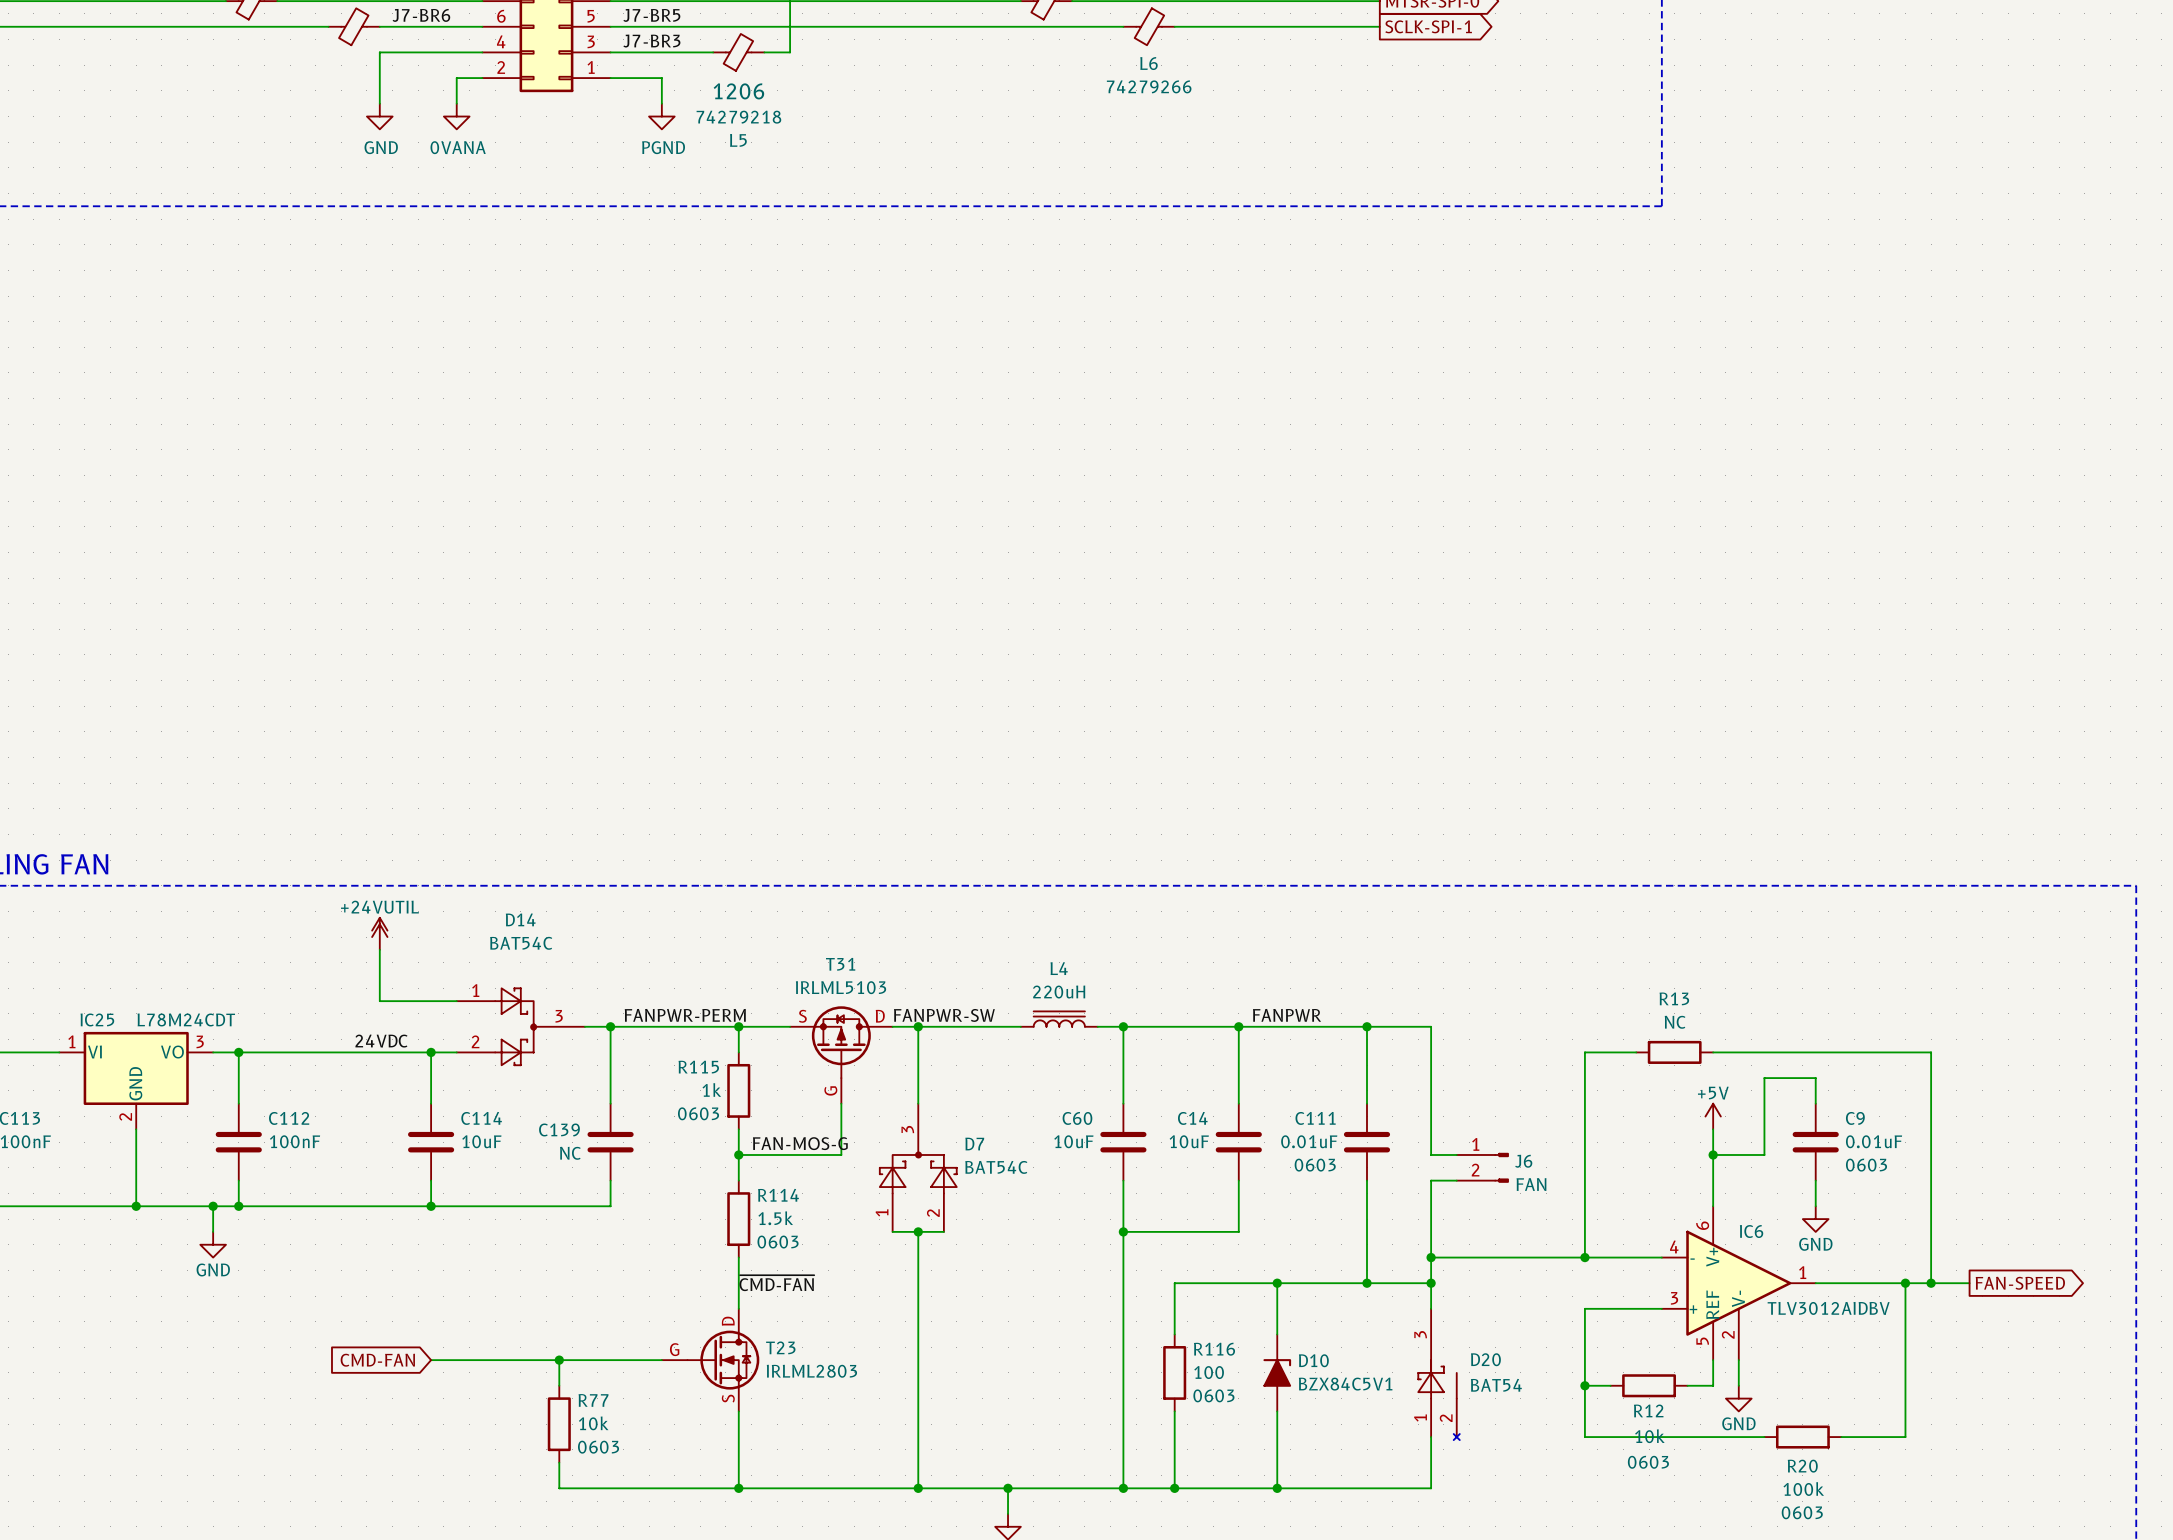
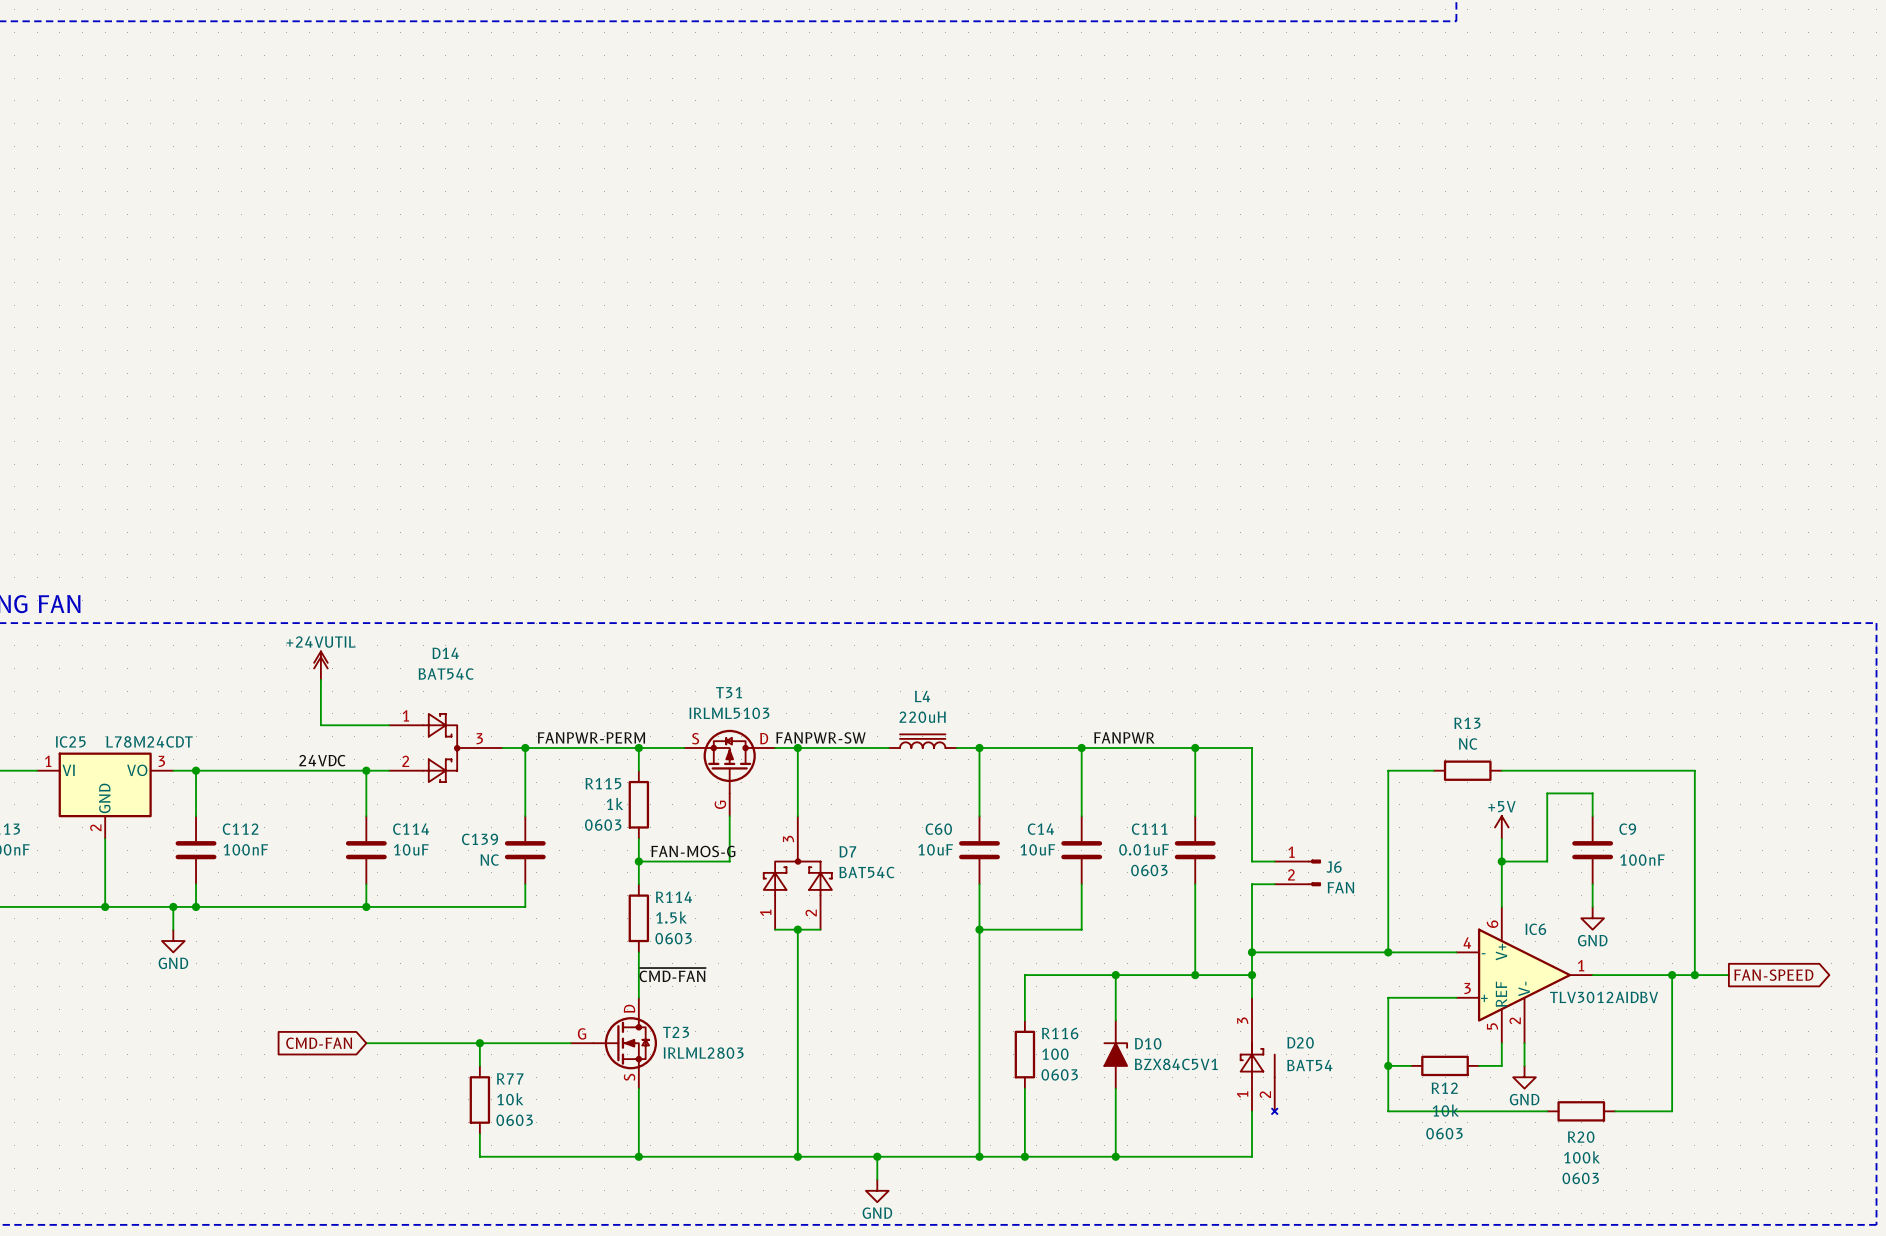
C9 value: 0.01uF (1874, 1141) -> 100nF (1642, 860)
C9 text: 0603 (1866, 1165) -> none

